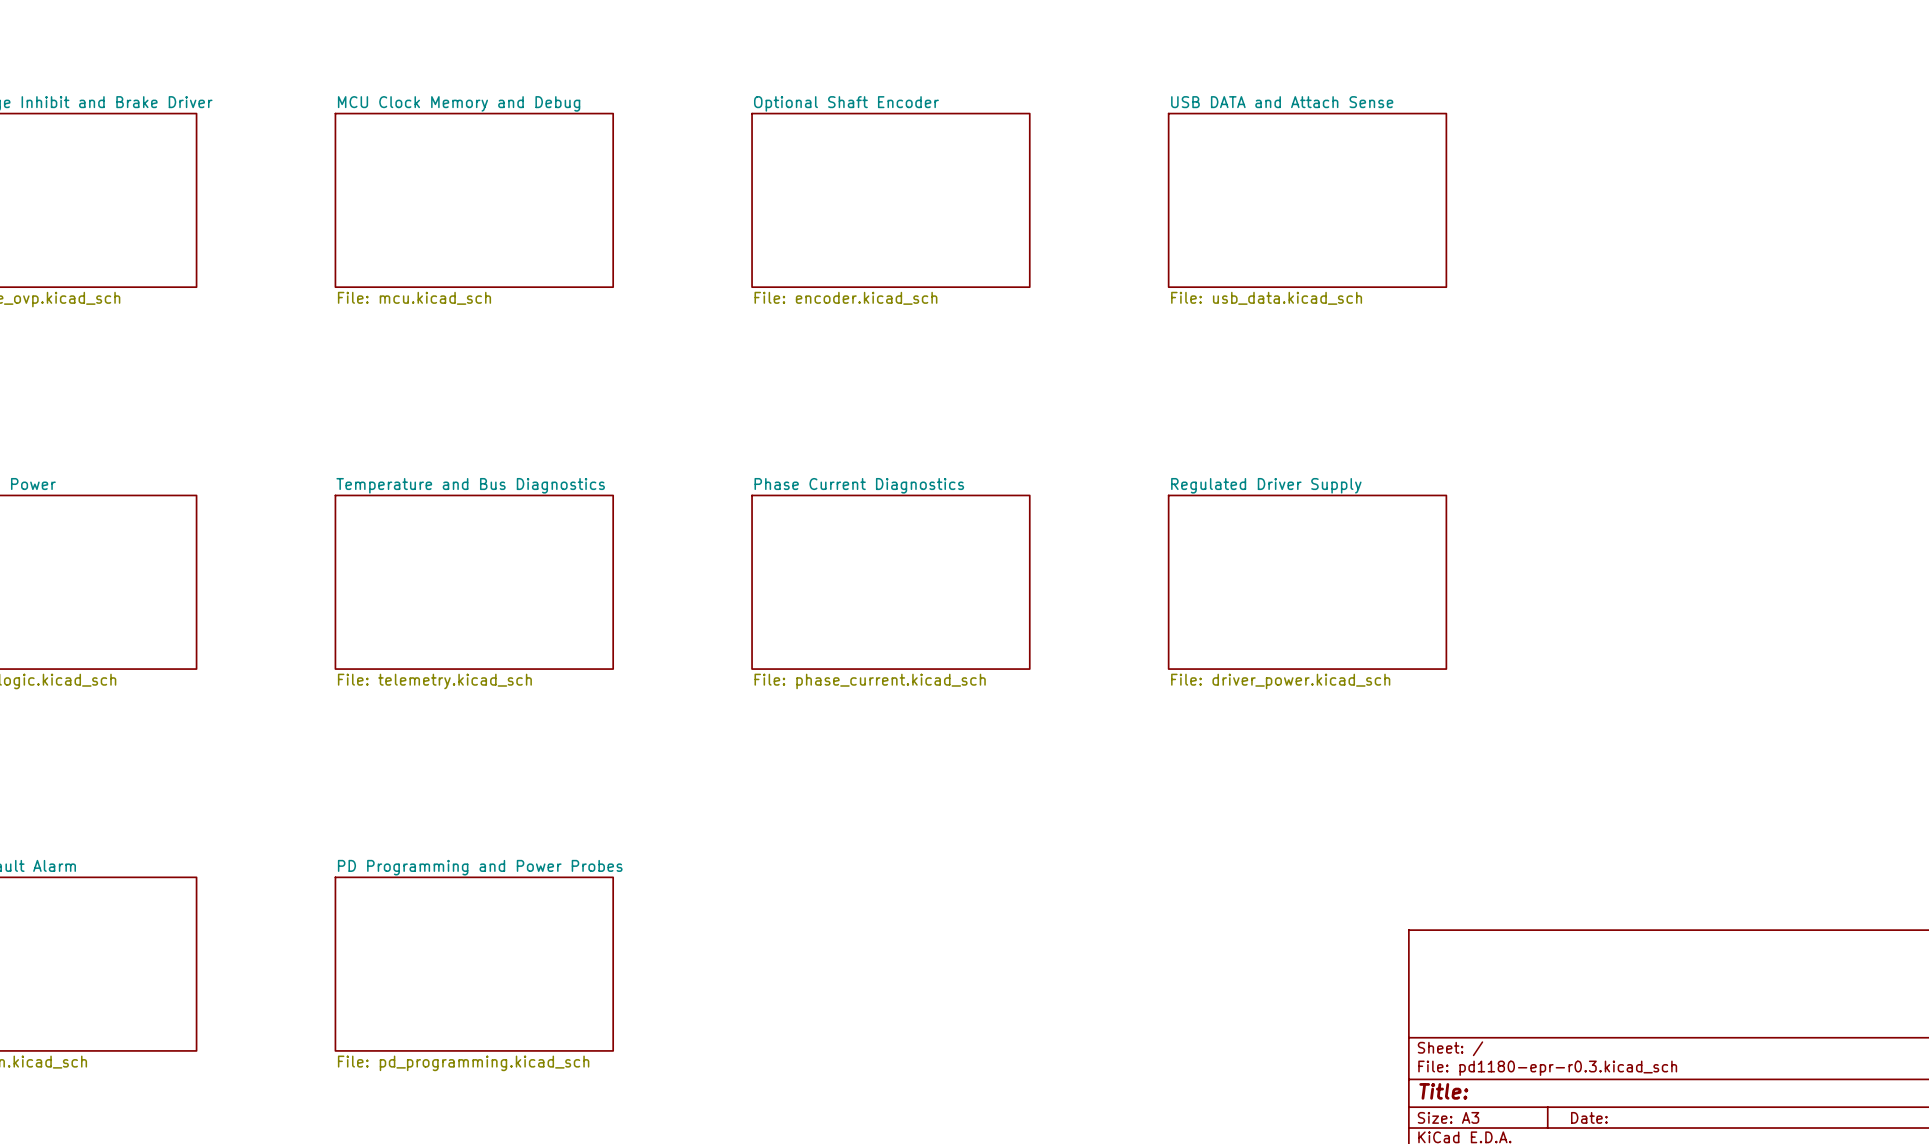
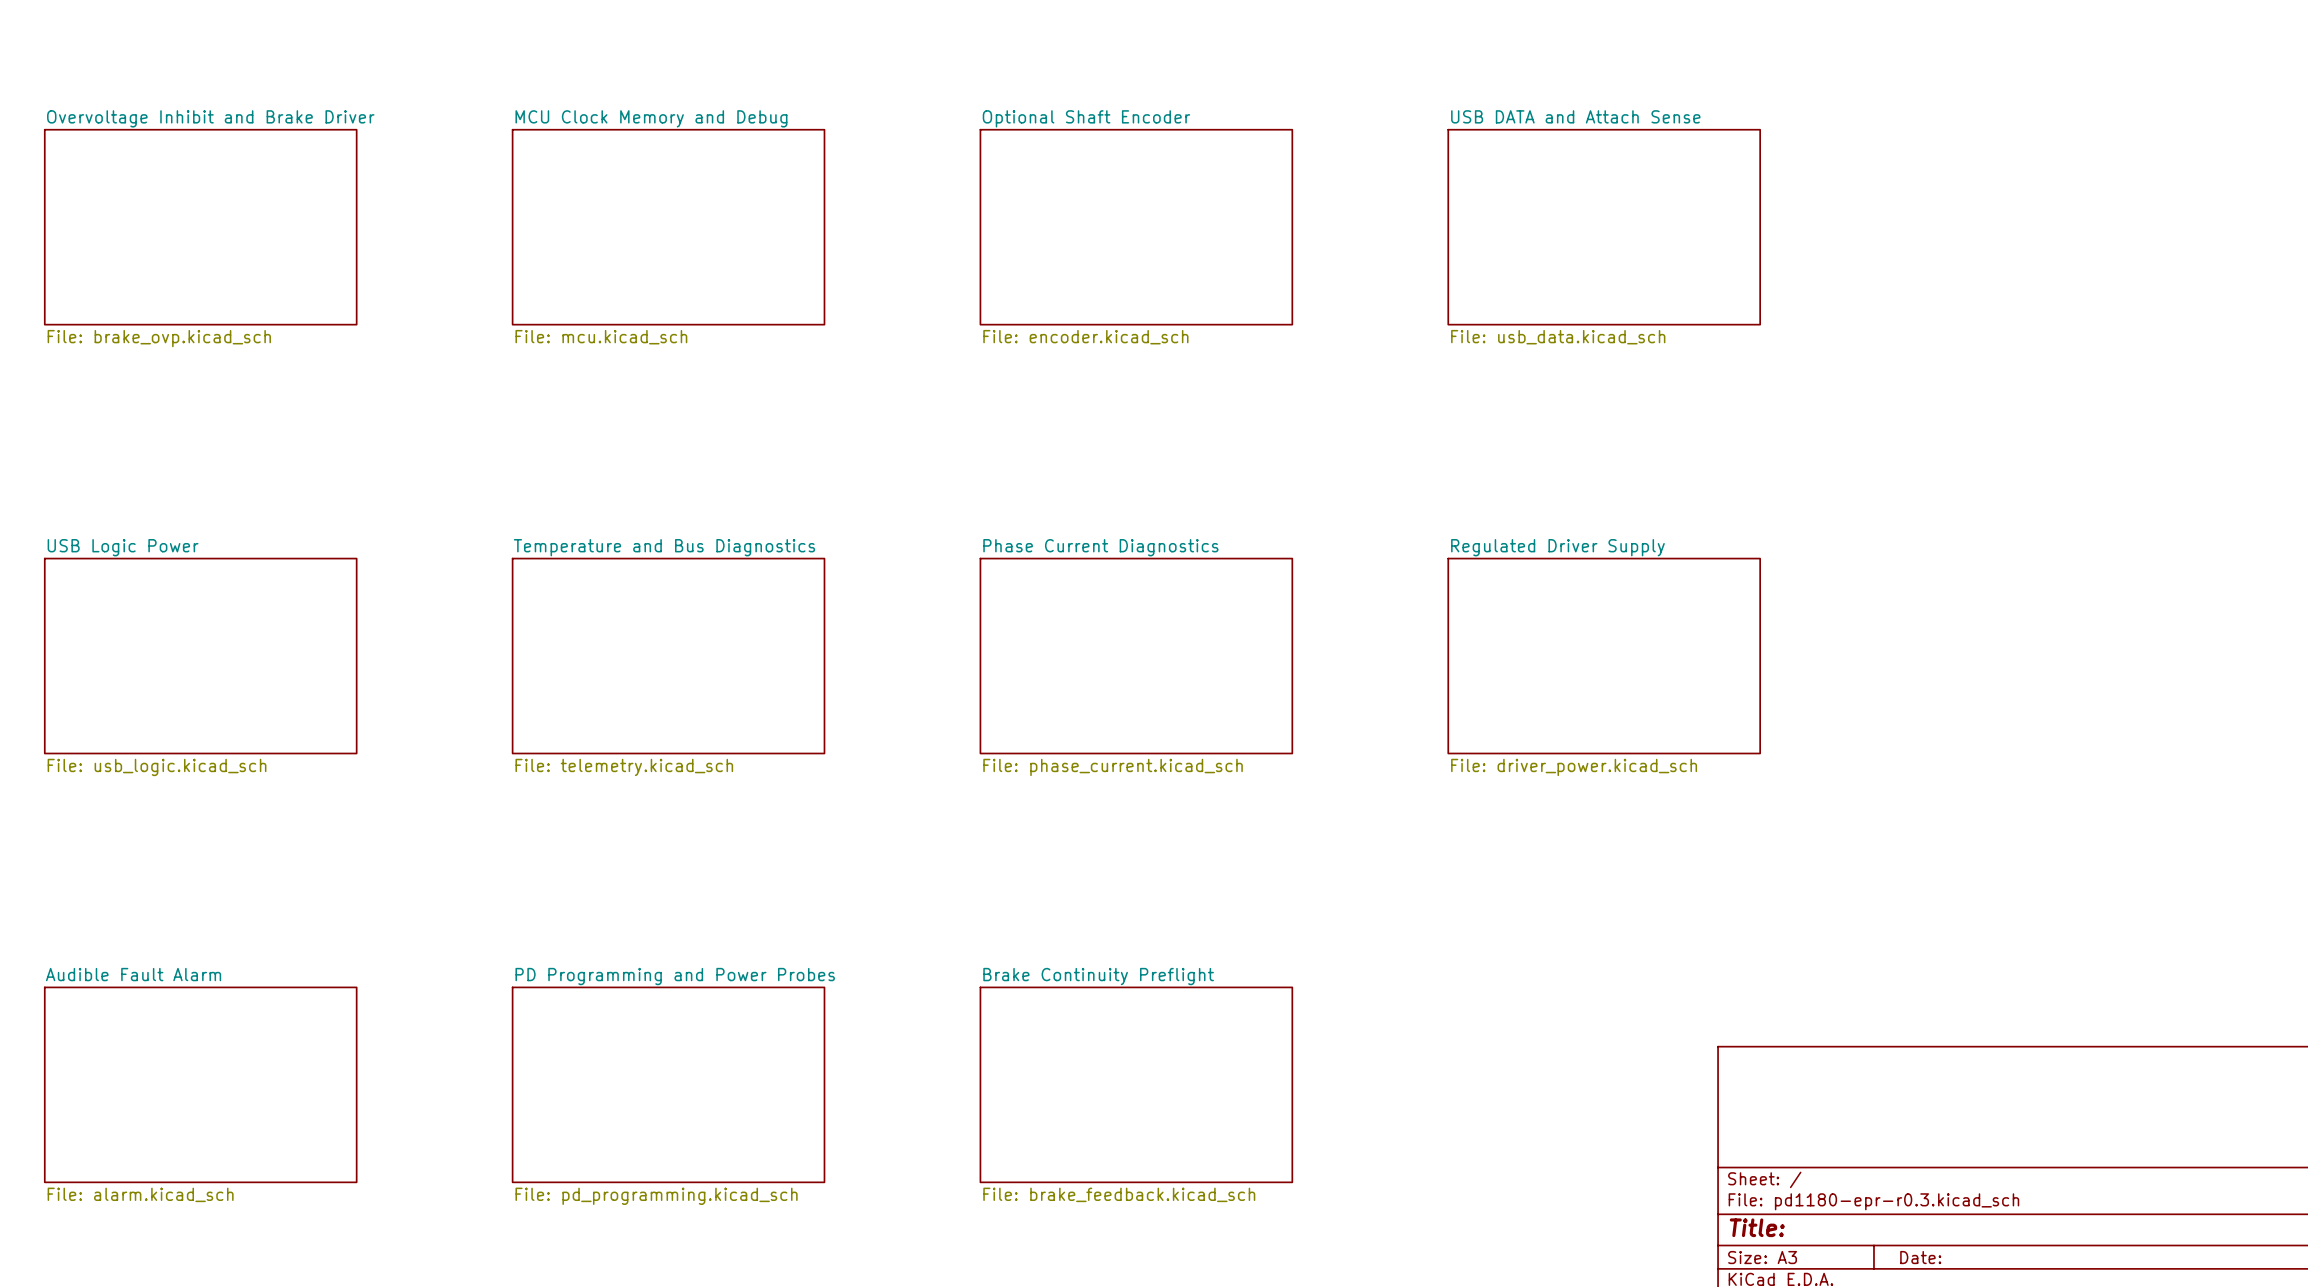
sheet Brake Continuity Preflight: none -> File: brake_feedback.kicad_sch (1136, 1084)

